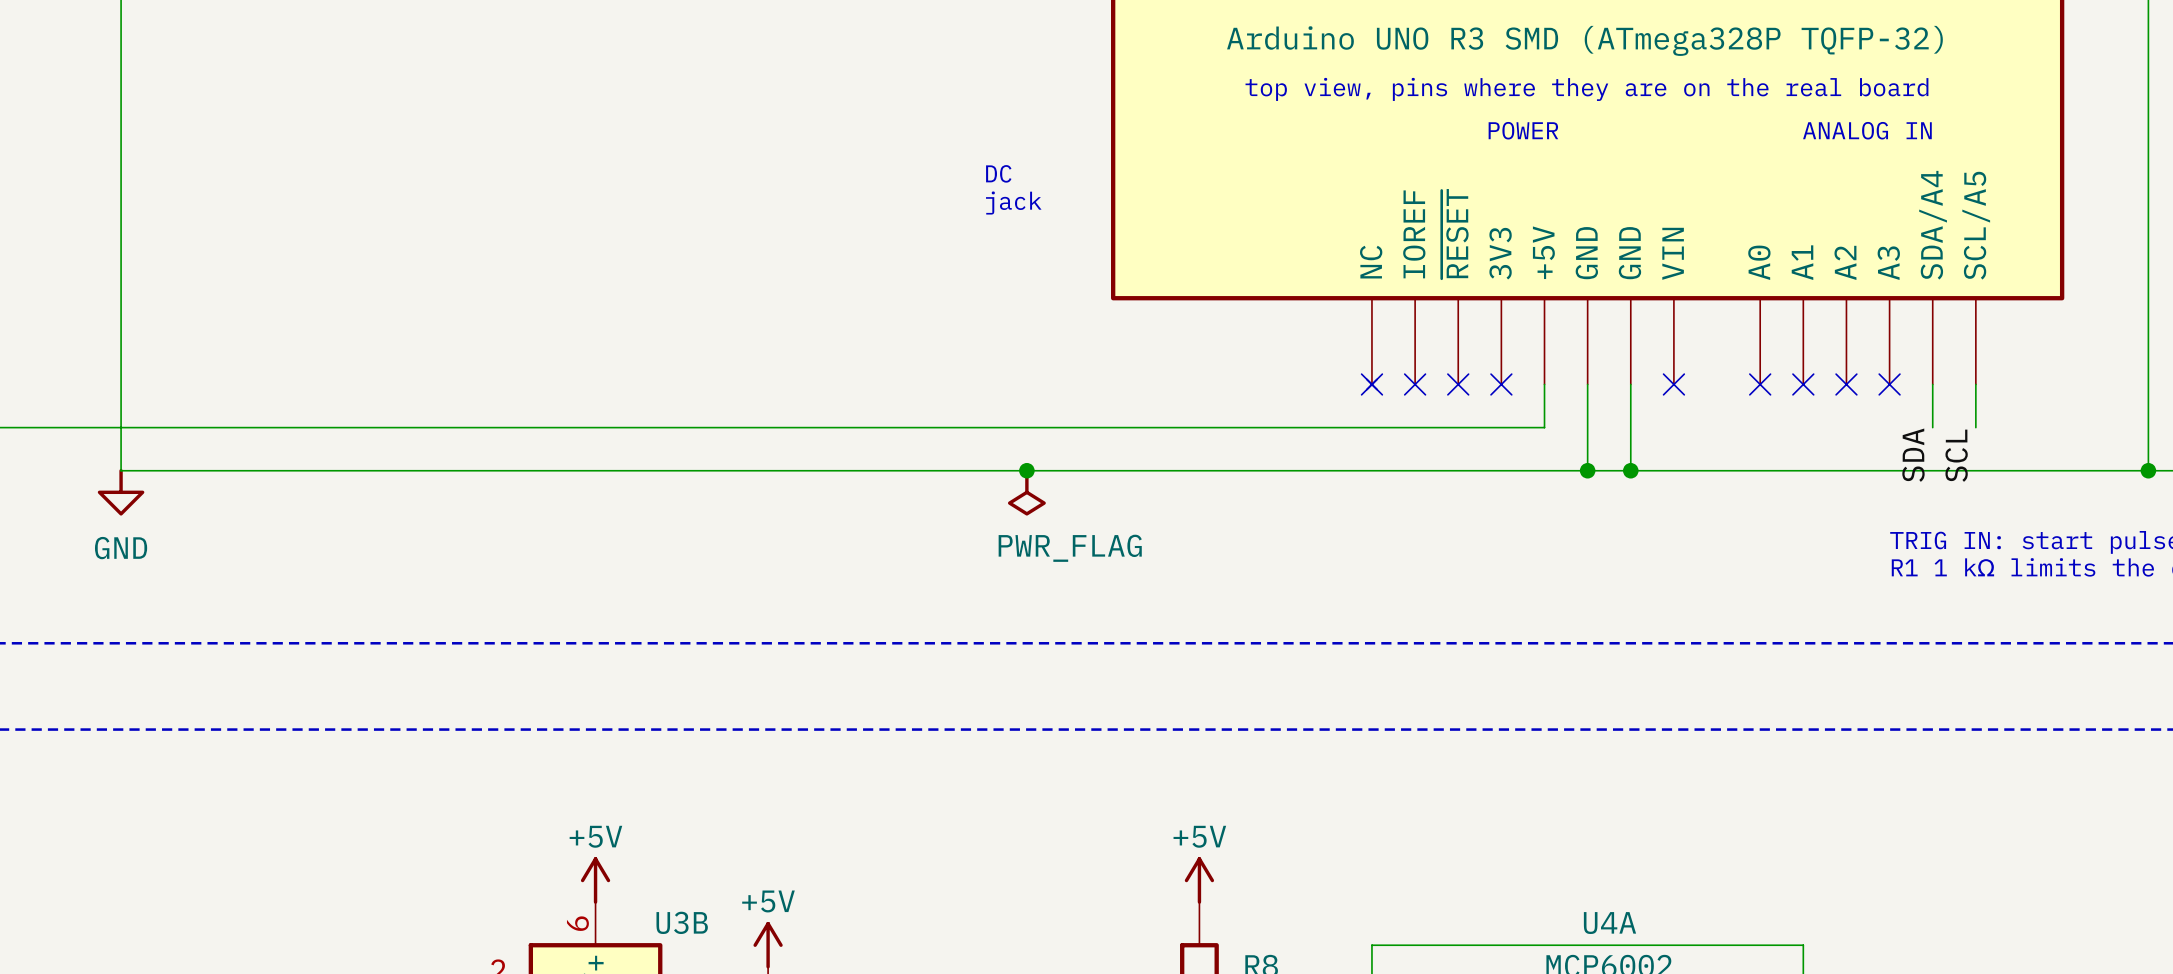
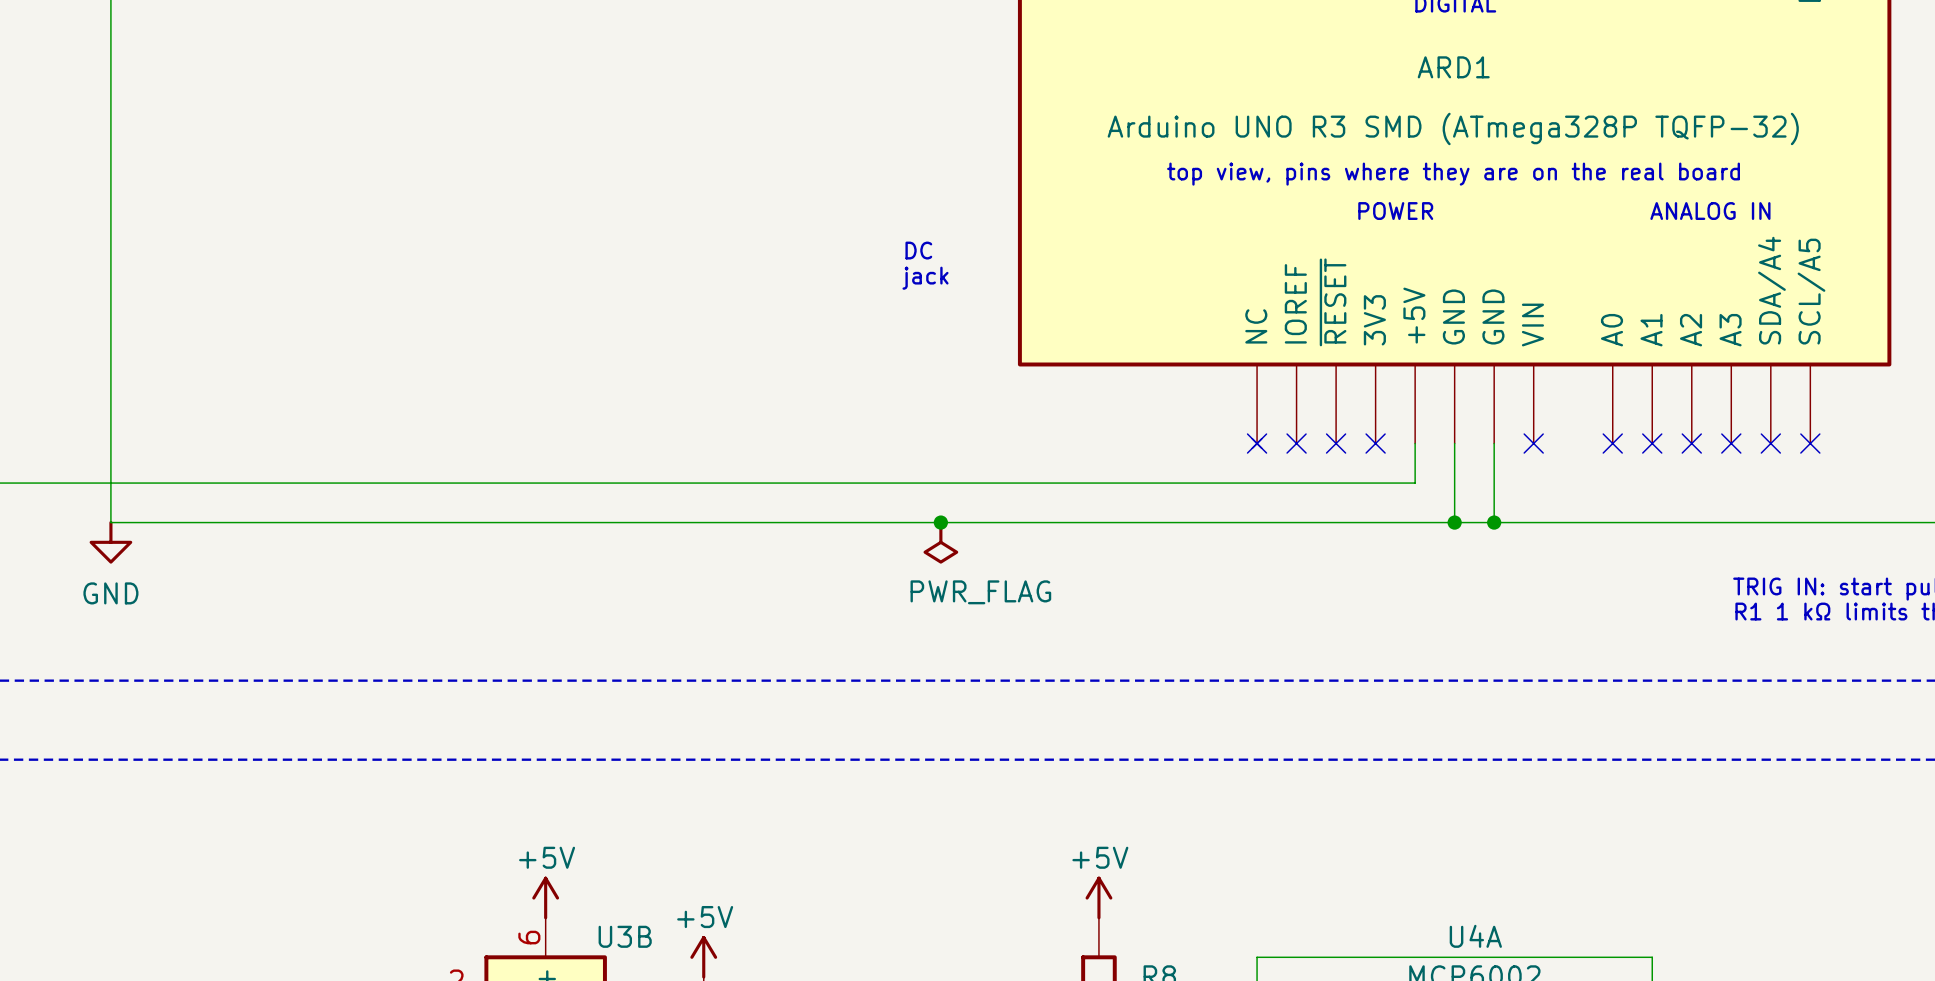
wire: (1932, 384) (1932, 427) -> none
no-connect mark: none -> (1770, 443)
wire: (1975, 384) (1975, 427) -> none
no-connect mark: none -> (1810, 443)
label: SDA (1913, 455) -> none
label: SCL (1956, 455) -> none

